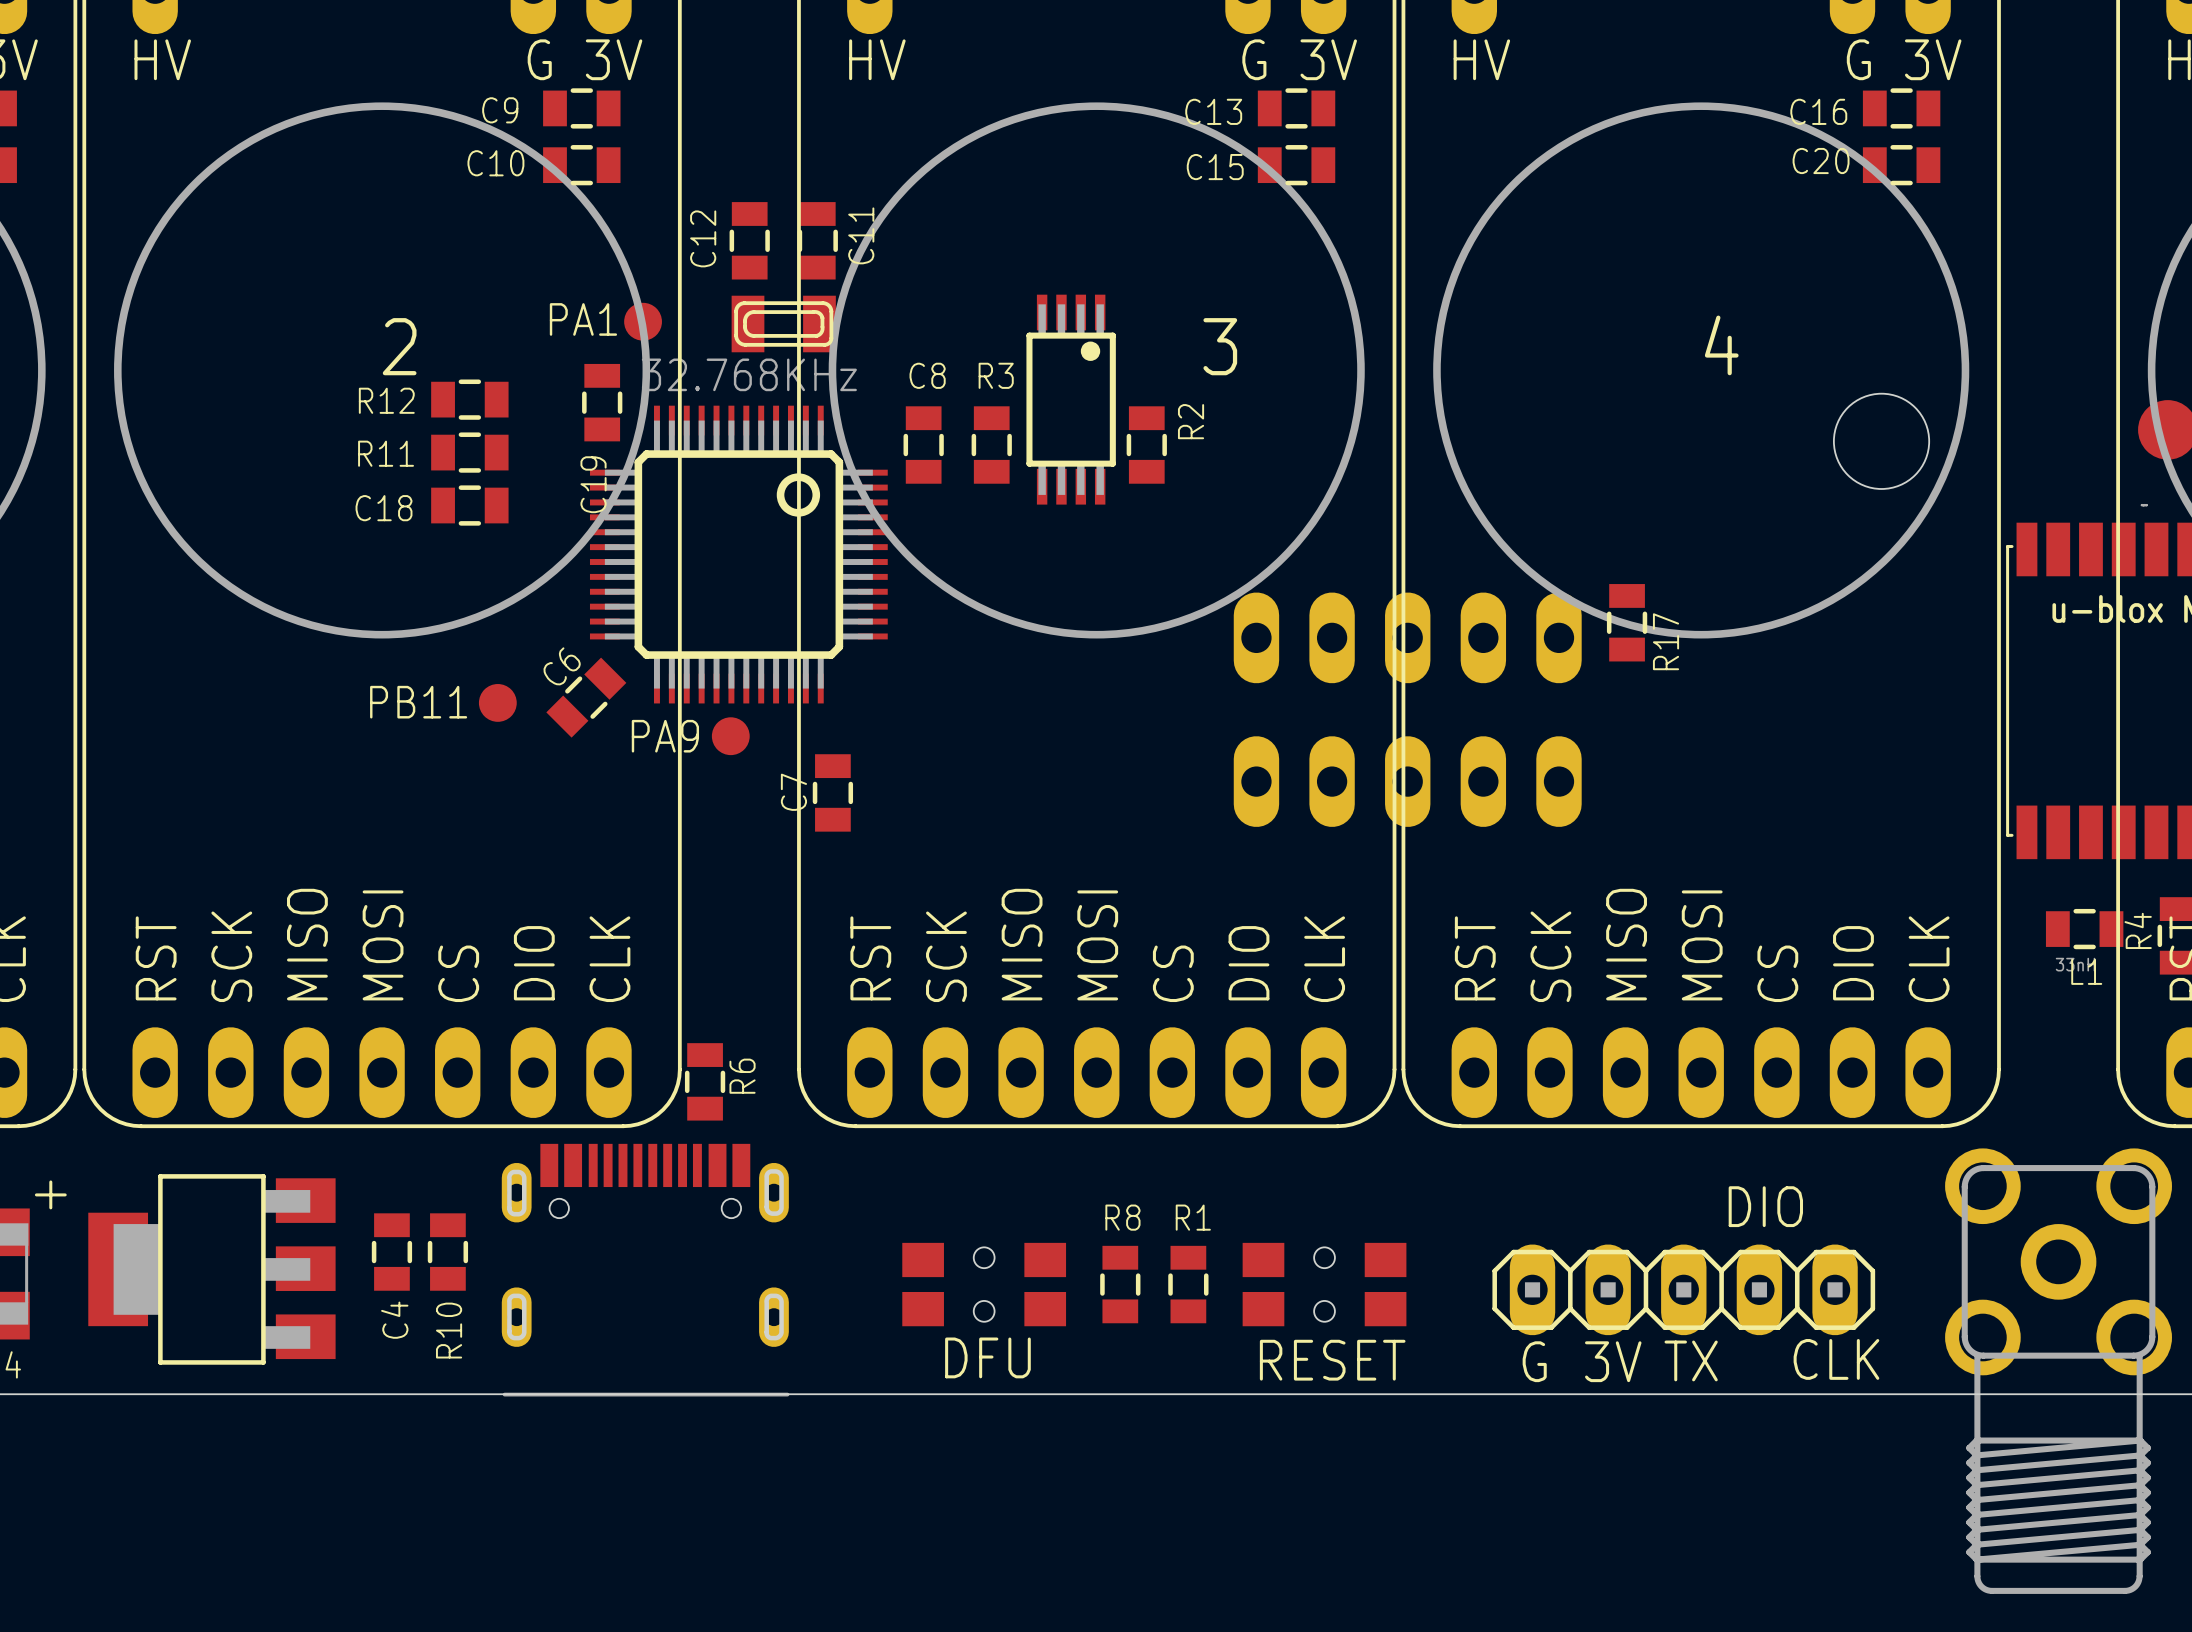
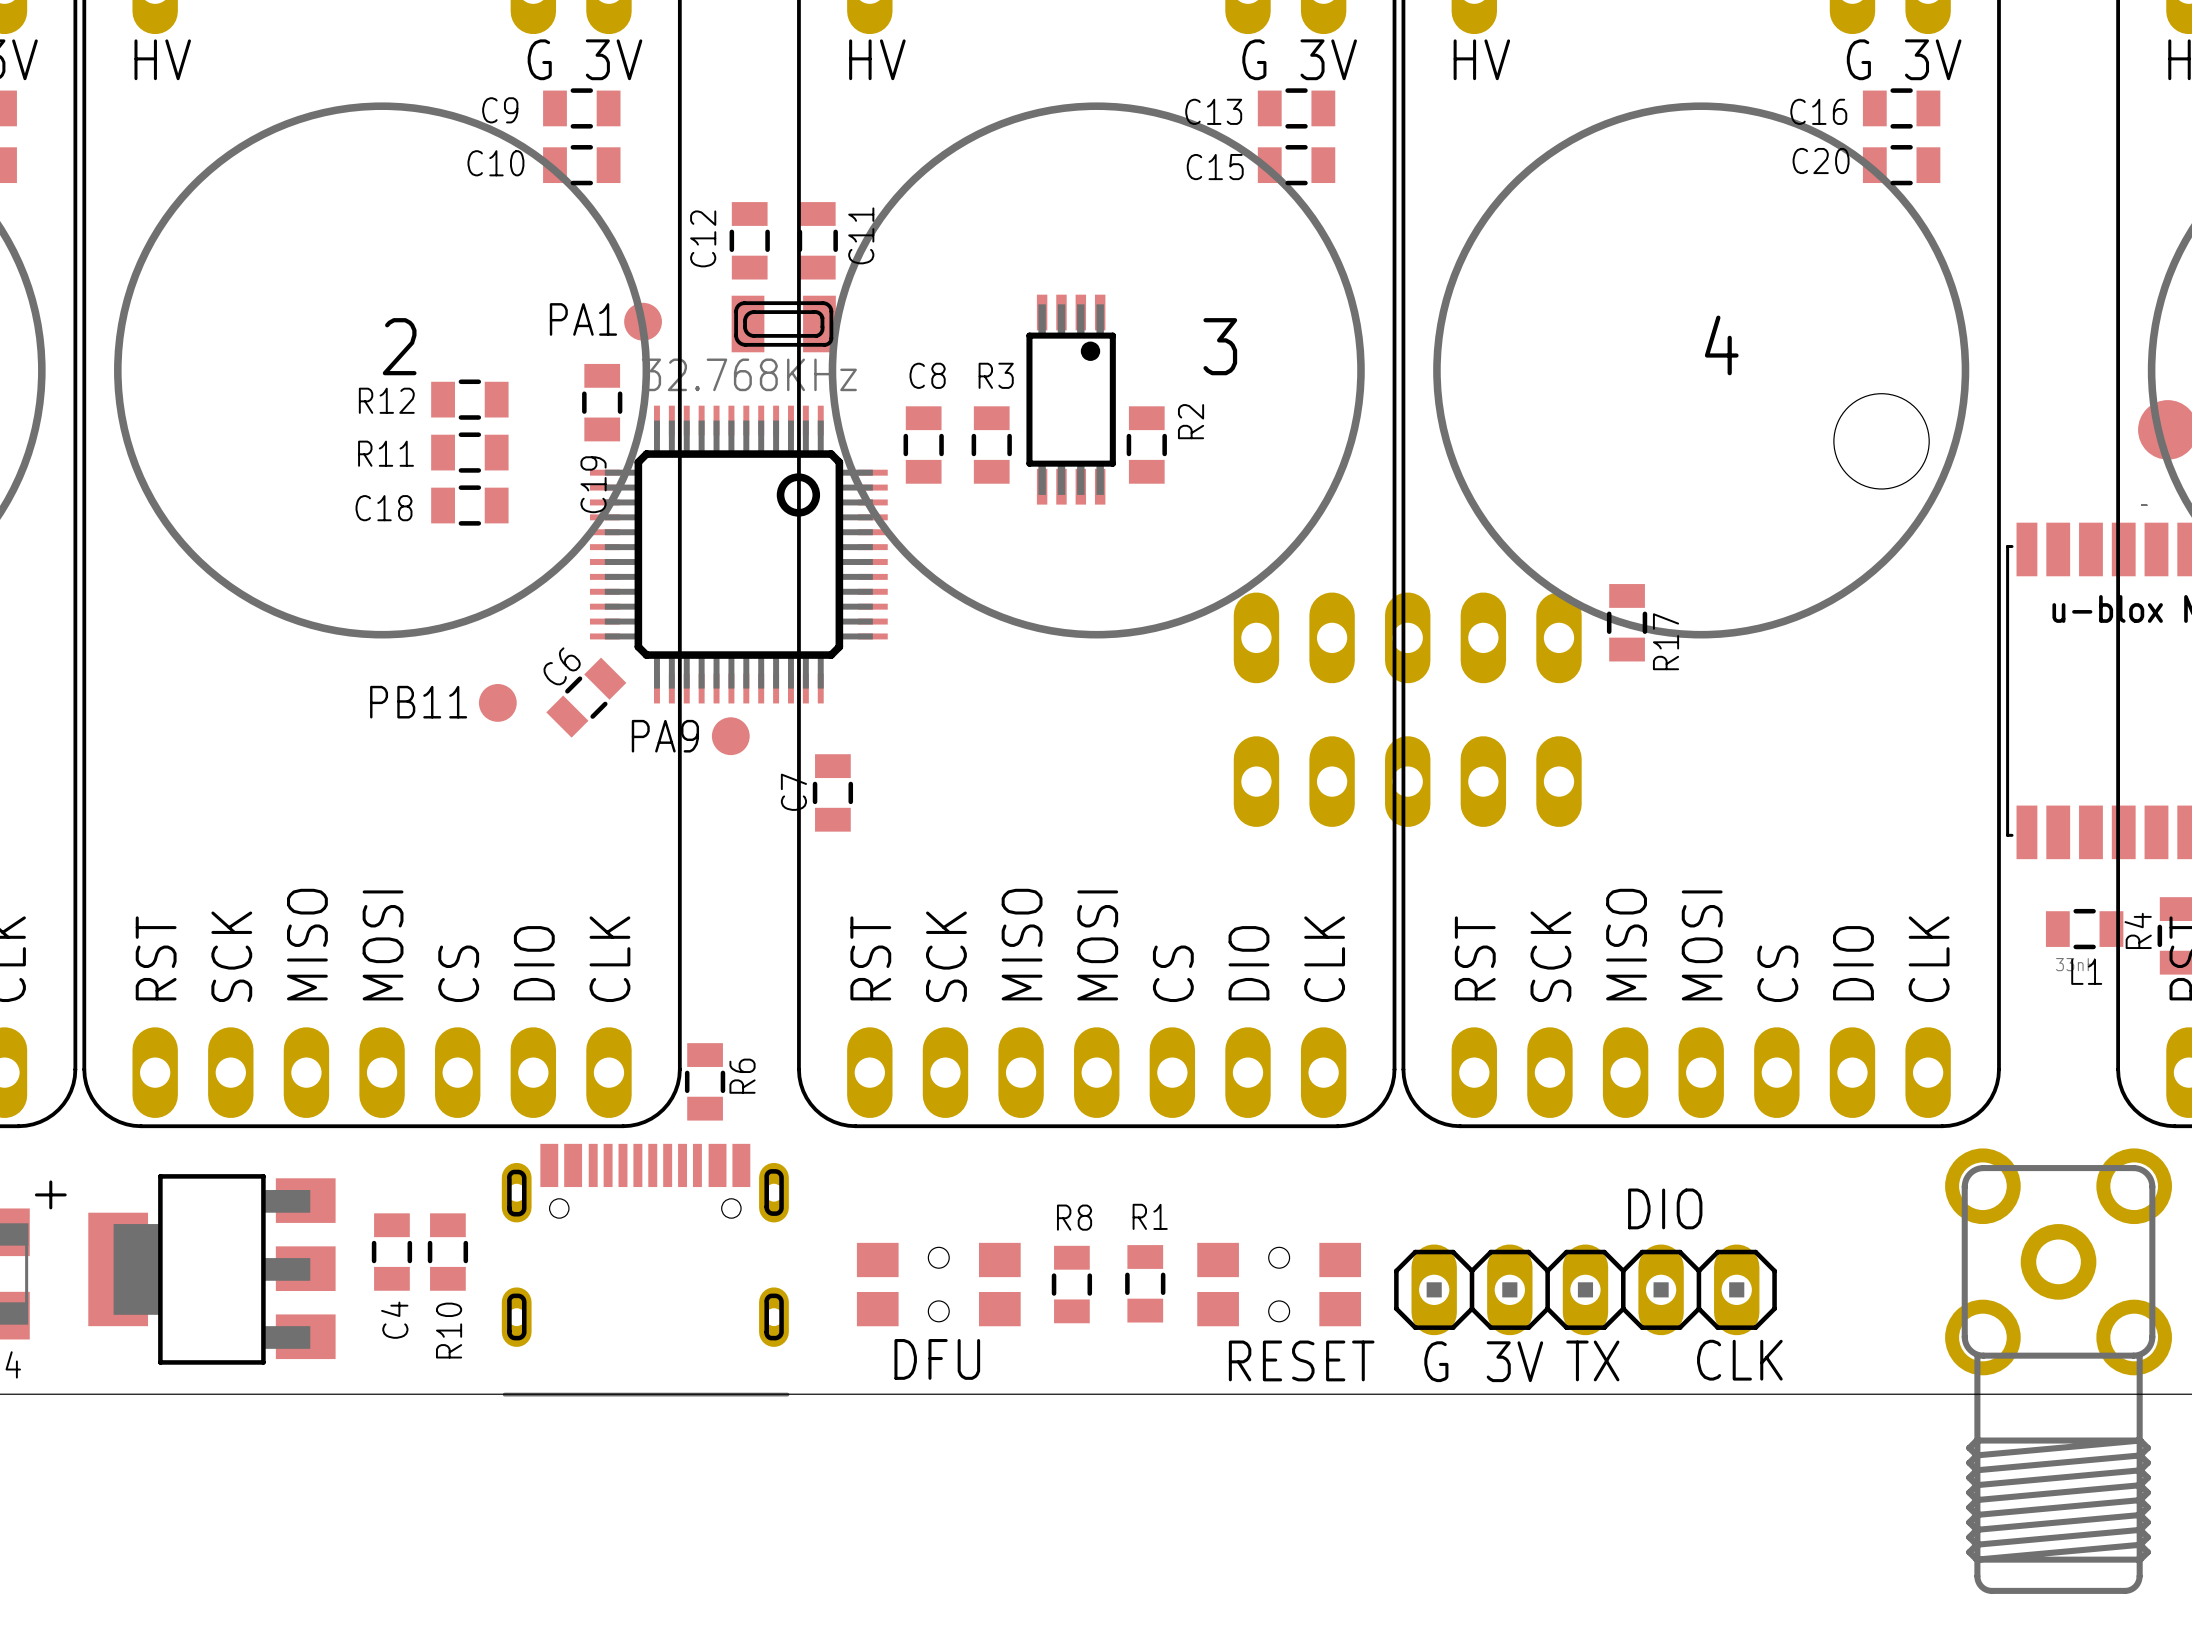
text position: DIO (1765, 1206) -> DIO (1665, 1208)
part position: (984, 1284) -> (938, 1284)
R8 position: (1120, 1284) -> (1071, 1284)
R1 position: (1188, 1284) -> (1145, 1283)
part position: (1324, 1284) -> (1279, 1284)
part position: (1683, 1289) -> (1585, 1289)
text position: DFU (987, 1357) -> DFU (937, 1359)
text position: CLK (1836, 1359) -> CLK (1739, 1360)
text position: RESET (1332, 1360) -> RESET (1301, 1360)
text position: TX (1691, 1360) -> TX (1592, 1360)
text position: G (1534, 1361) -> G (1436, 1361)
text position: 3V (1613, 1361) -> 3V (1514, 1361)

